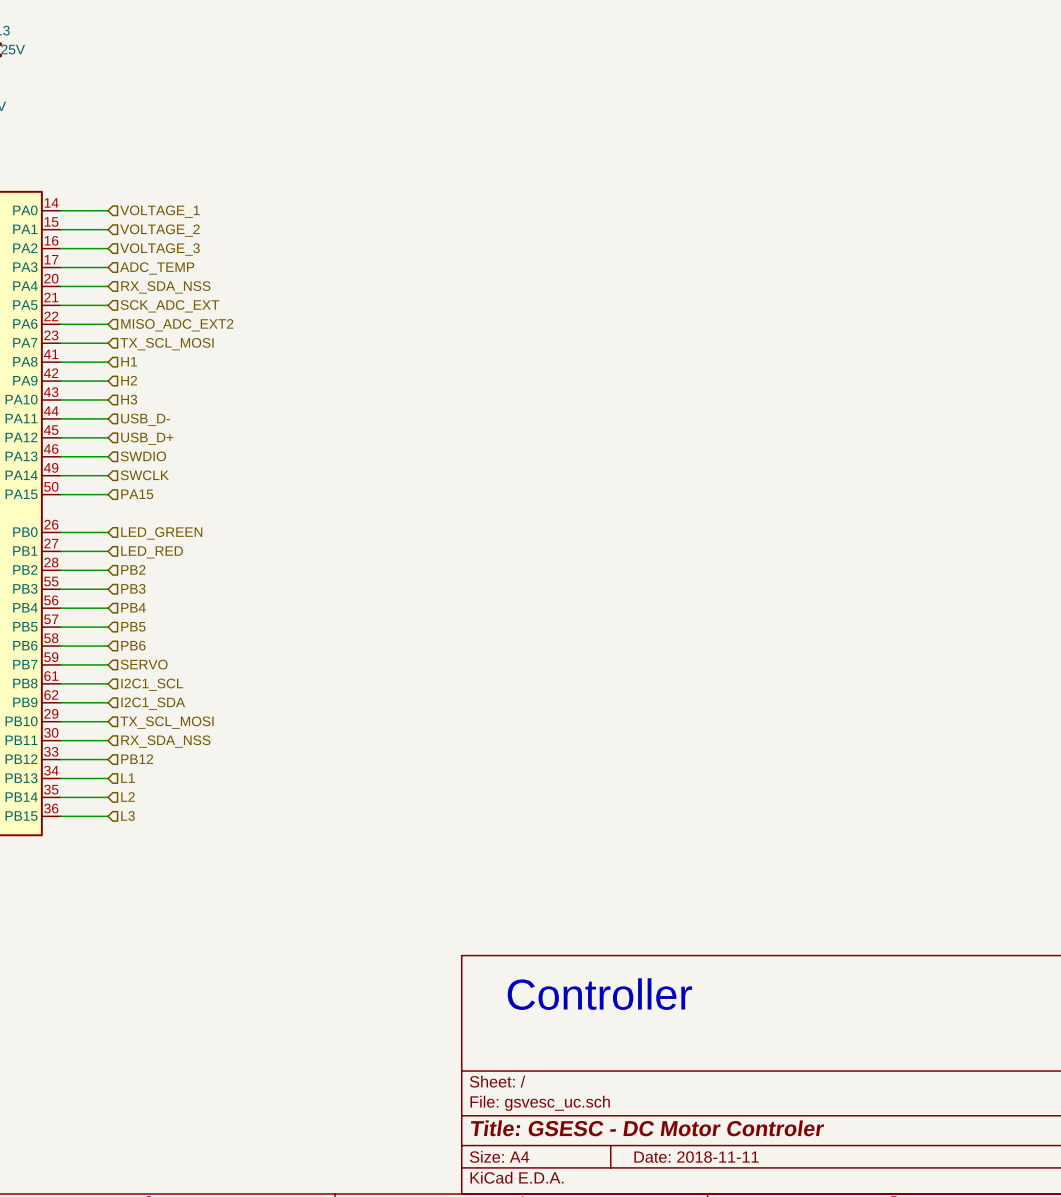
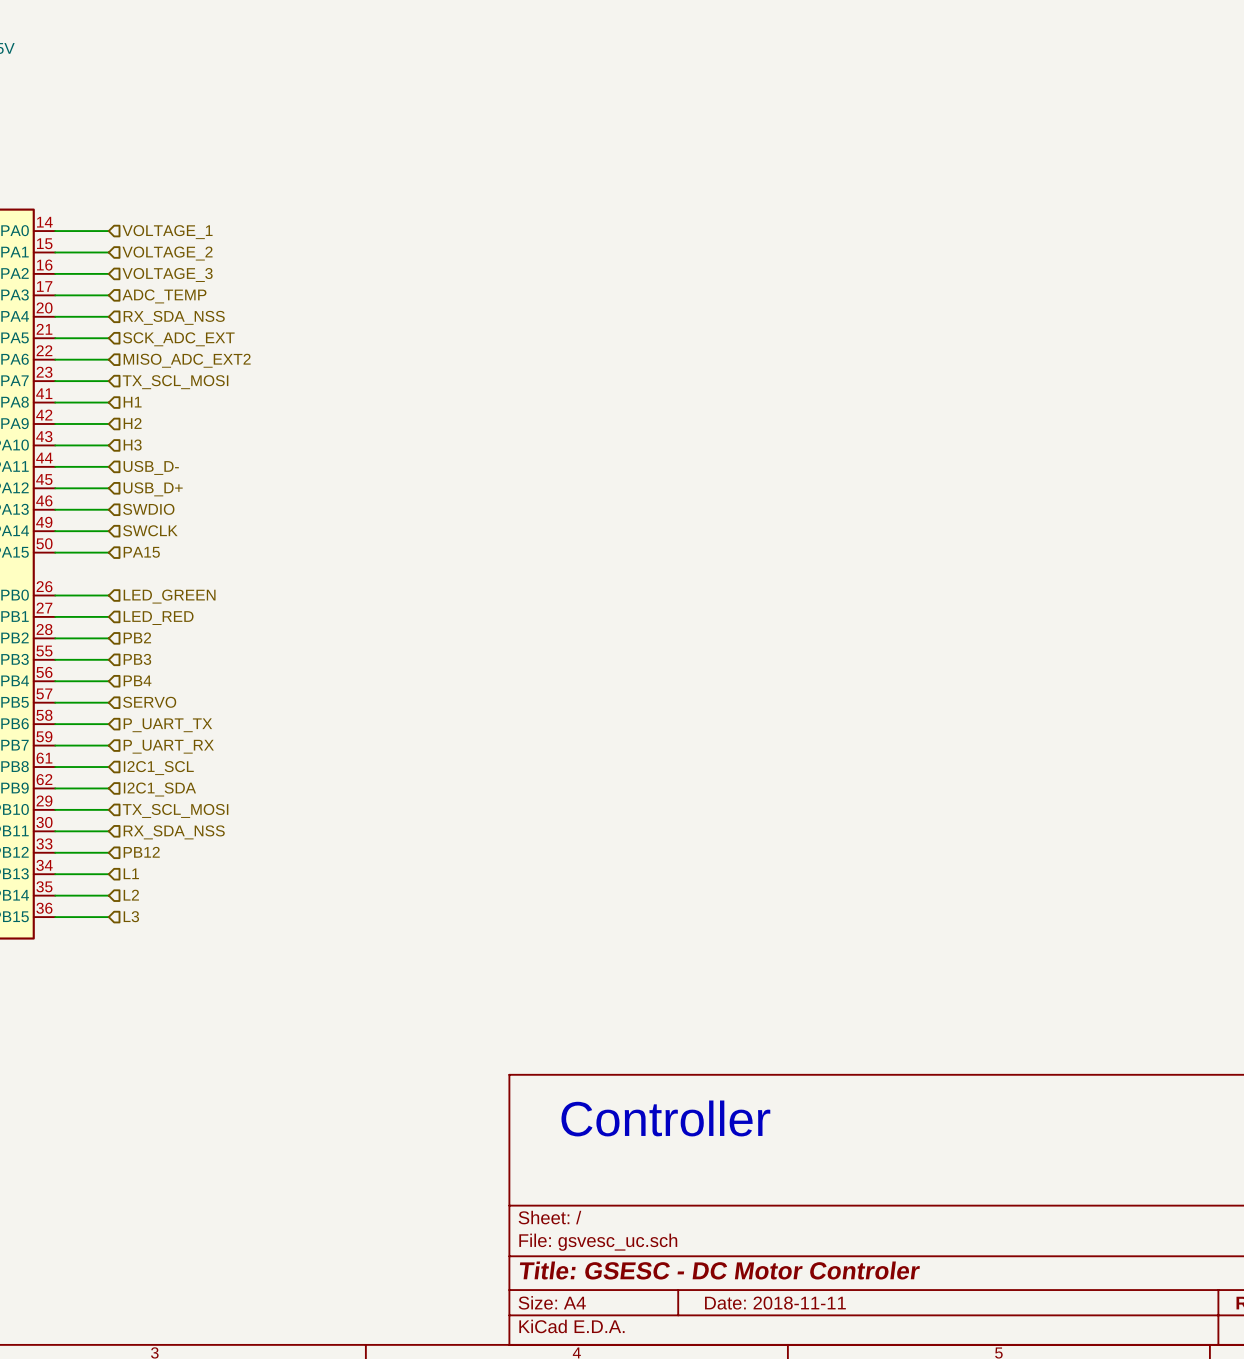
hierarchical label: PB5 (133, 626) -> SERVO (149, 702)
hierarchical label: PB6 (133, 645) -> P_UART_TX (167, 725)
hierarchical label: SERVO (144, 664) -> P_UART_RX (168, 746)

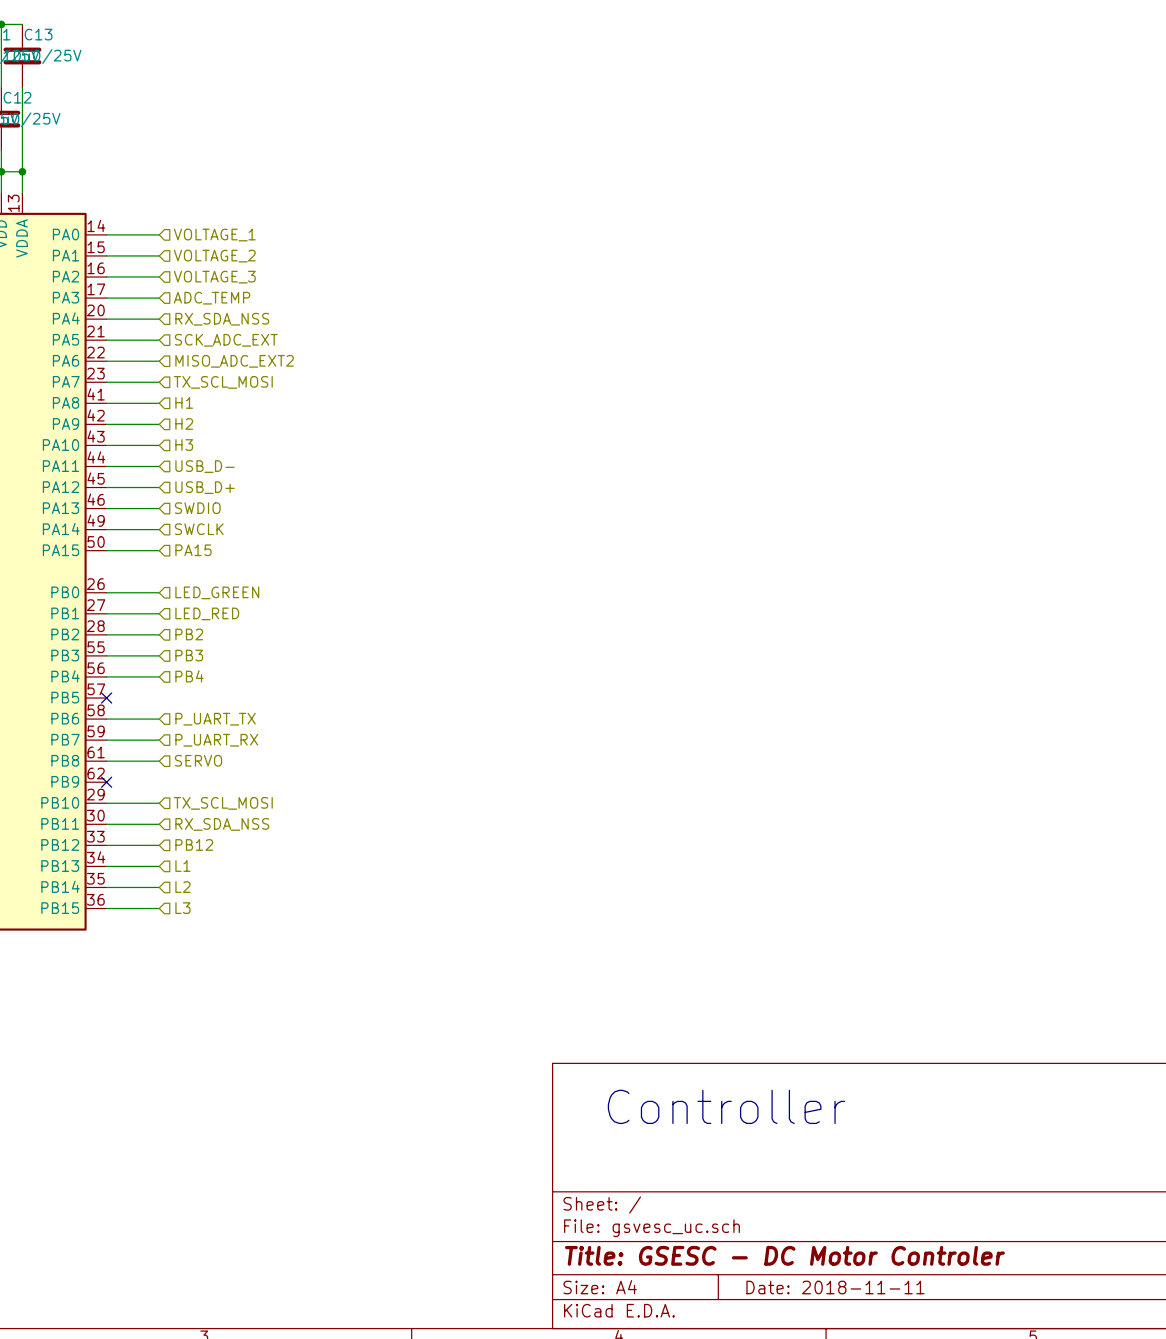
wire: (55, 702) (108, 702) -> none
no-connect mark: none -> (106, 698)
hierarchical label: SERVO (149, 702) -> none
hierarchical label: I2C1_SCL (158, 768) -> SERVO (198, 760)
wire: (55, 788) (108, 788) -> none
no-connect mark: none -> (106, 782)
hierarchical label: I2C1_SDA (159, 789) -> none

